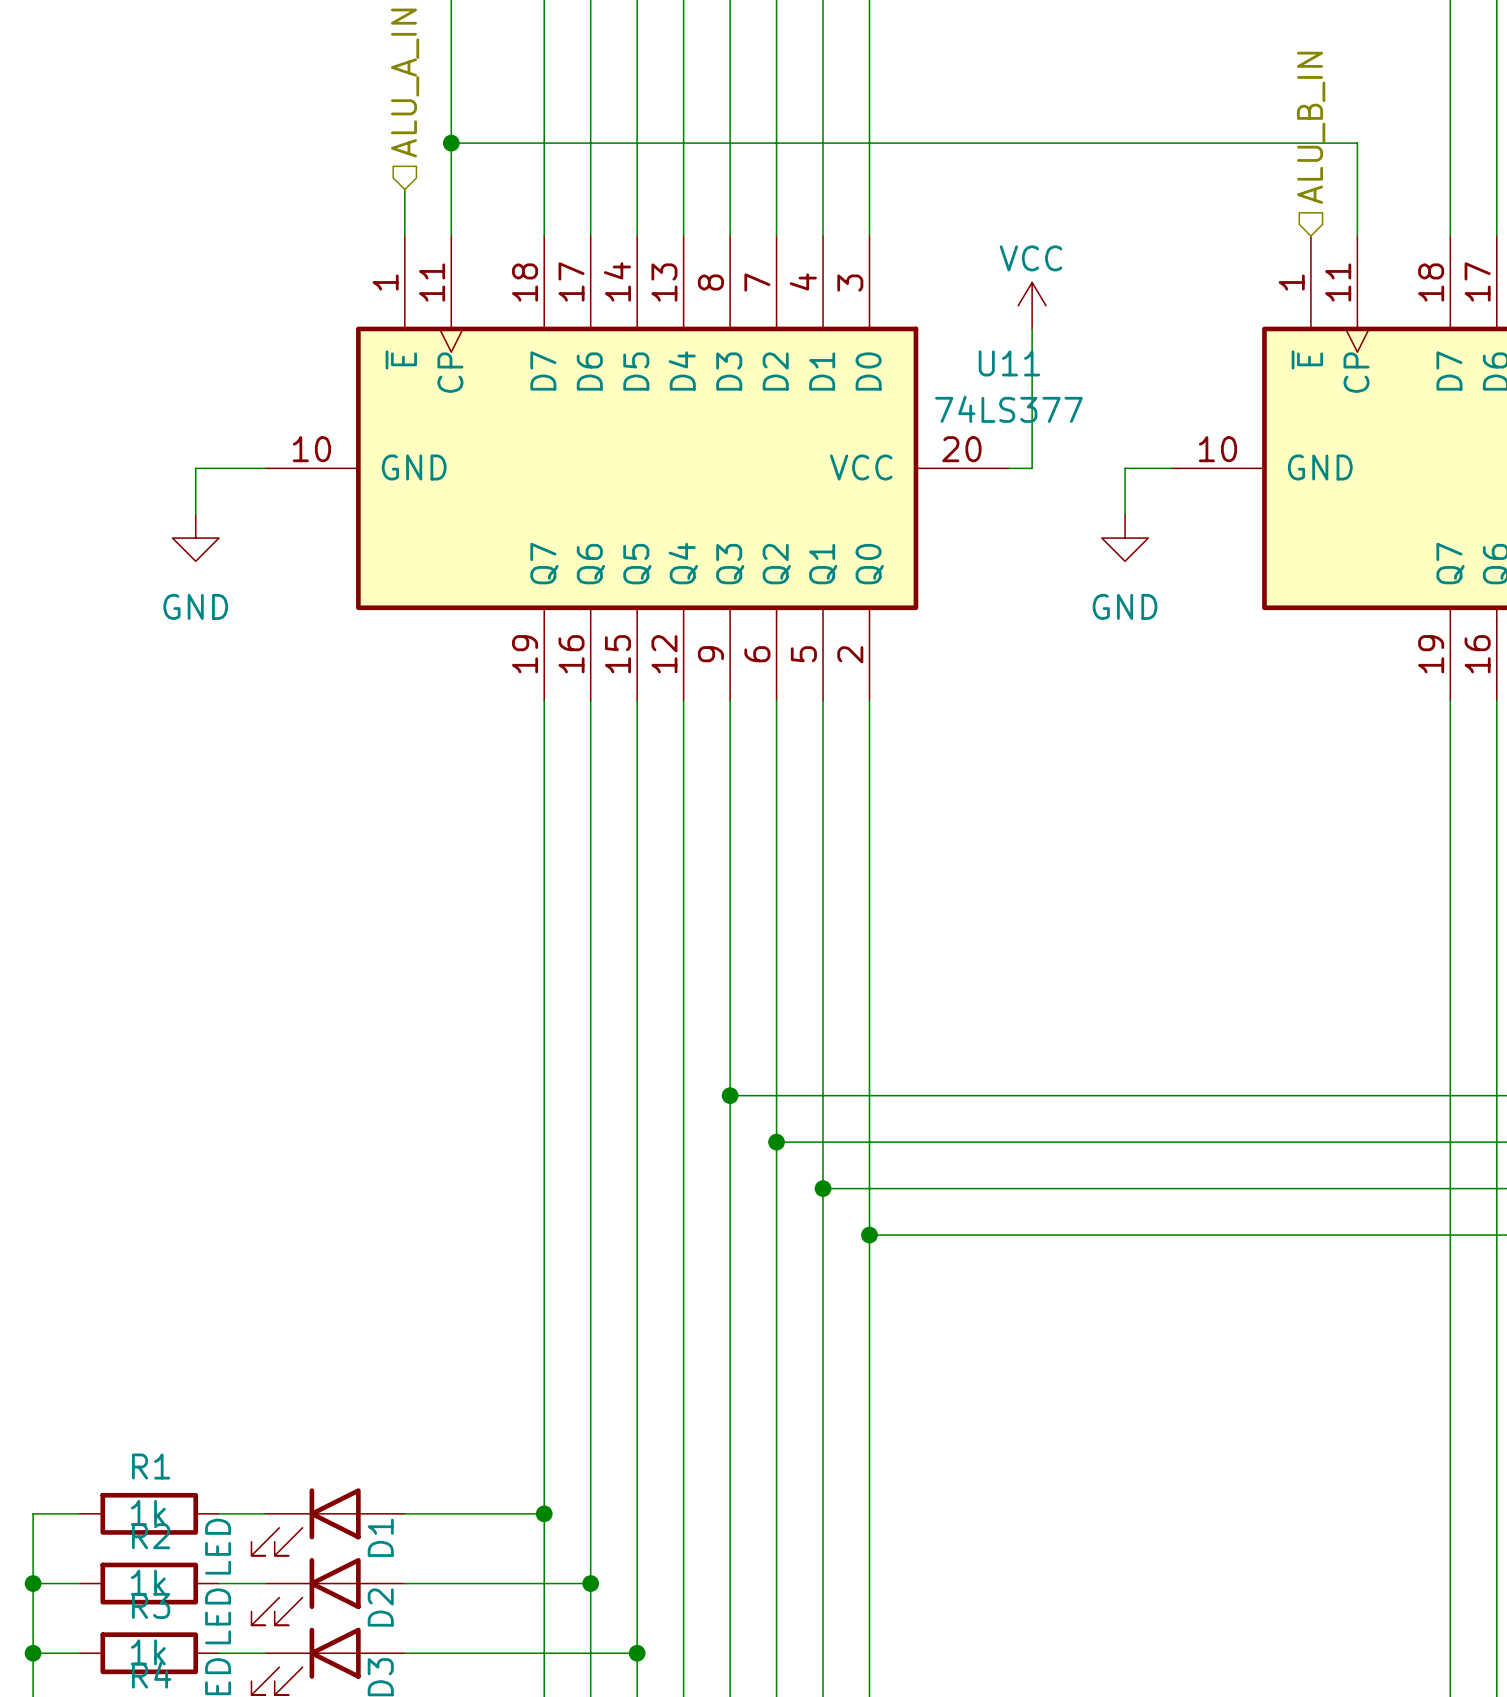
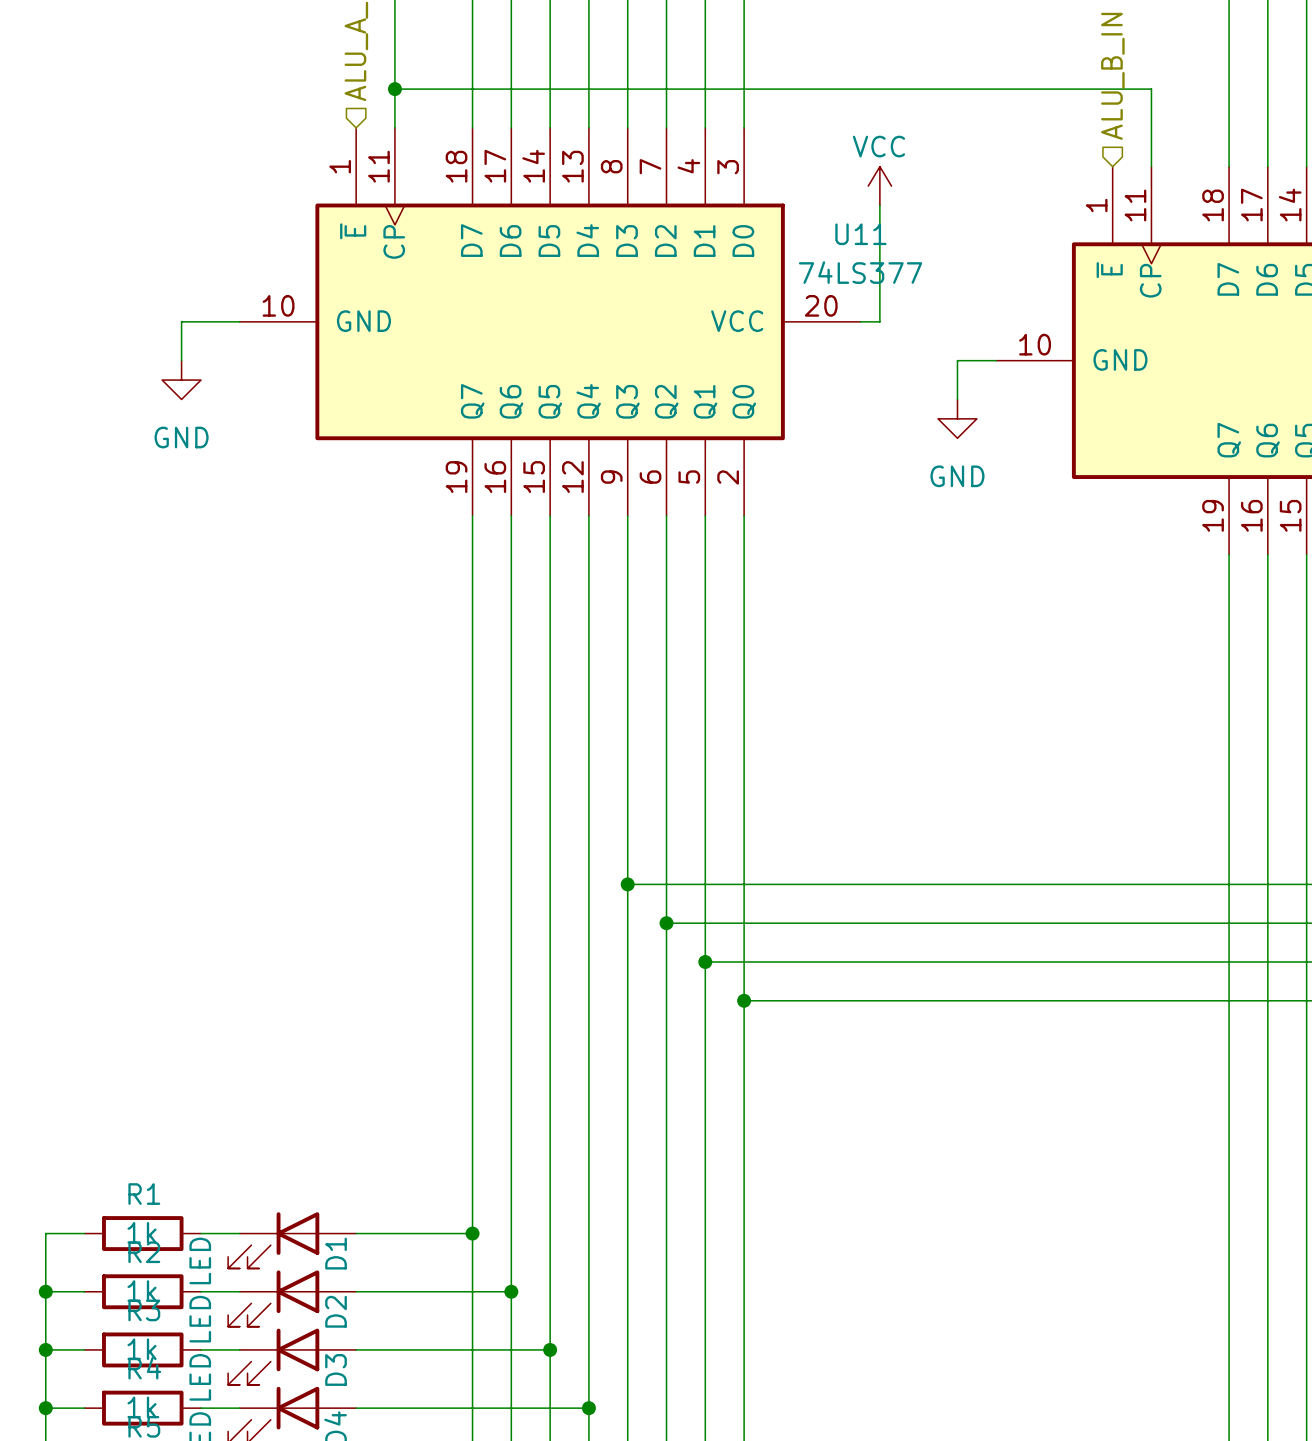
power symbol position: VCC (1032, 305) -> VCC (879, 186)
wire: (1032, 421) (1032, 468) (1008, 468) -> (879, 321) (860, 321)
wire: (265, 468) (195, 468) (195, 514) -> (239, 321) (181, 321) (181, 360)
U11 position: (637, 468) -> (550, 321)
power symbol position: GND (195, 538) -> GND (181, 380)

